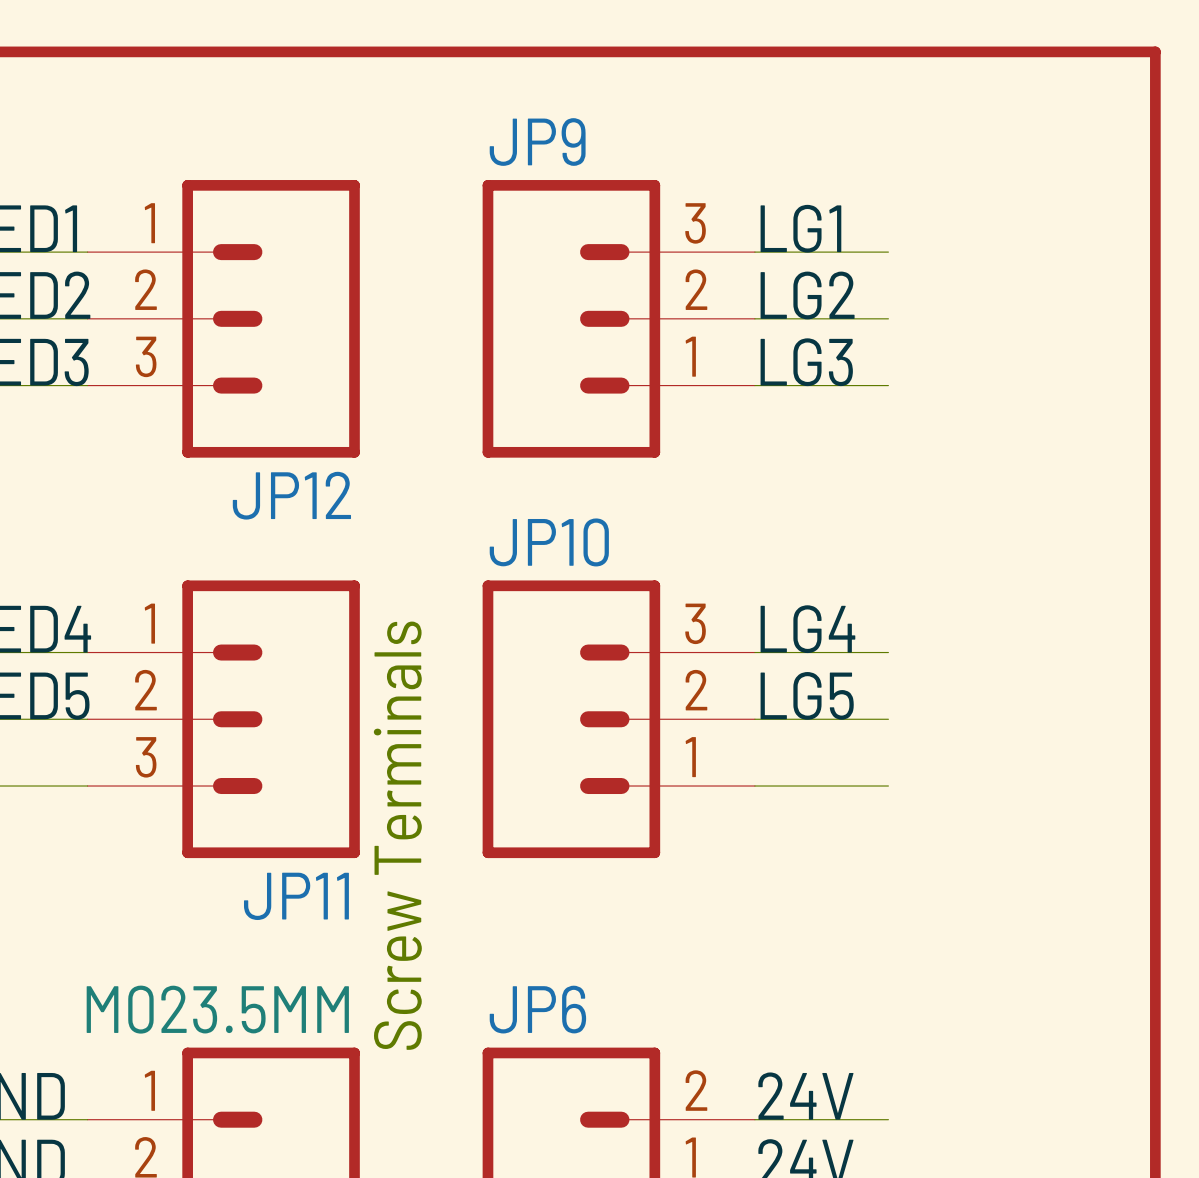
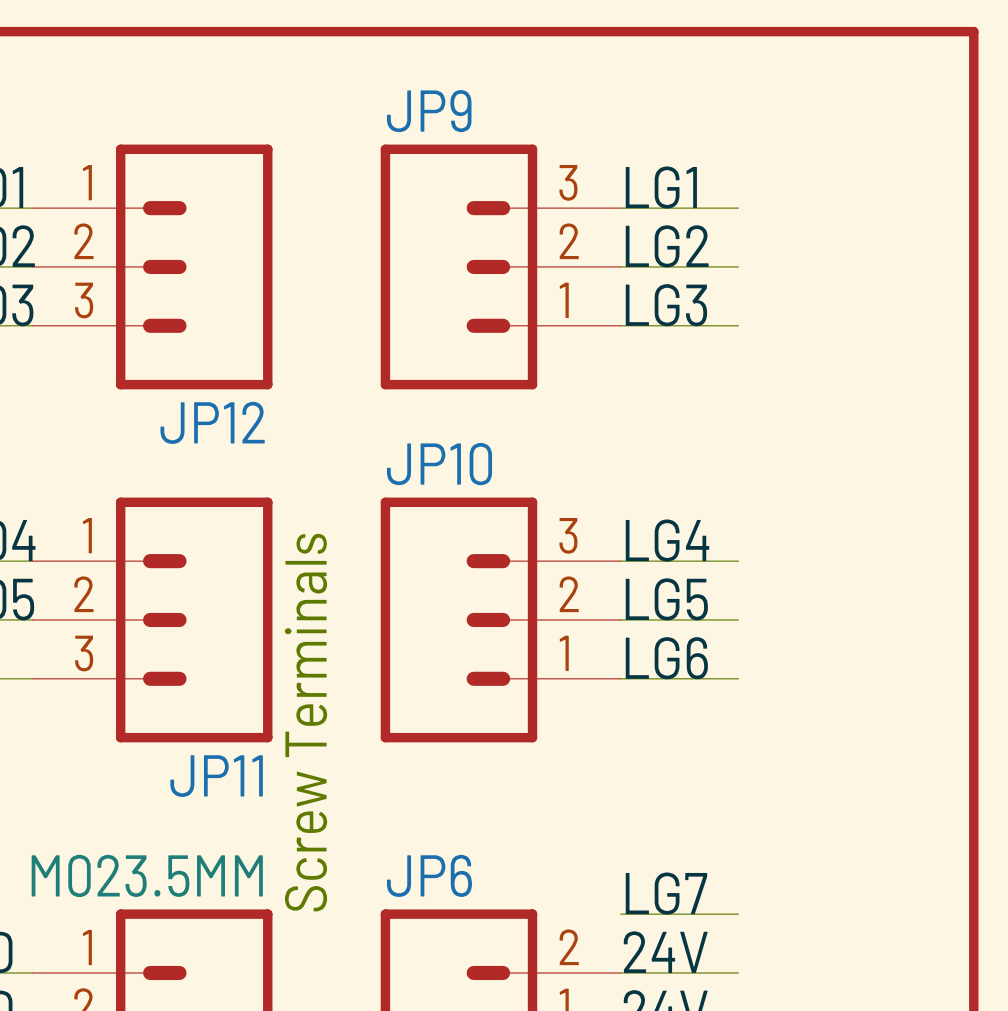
label: none -> LG6 (666, 658)
label: none -> LG7 (666, 893)
wire: none -> (620, 914) (738, 914)

